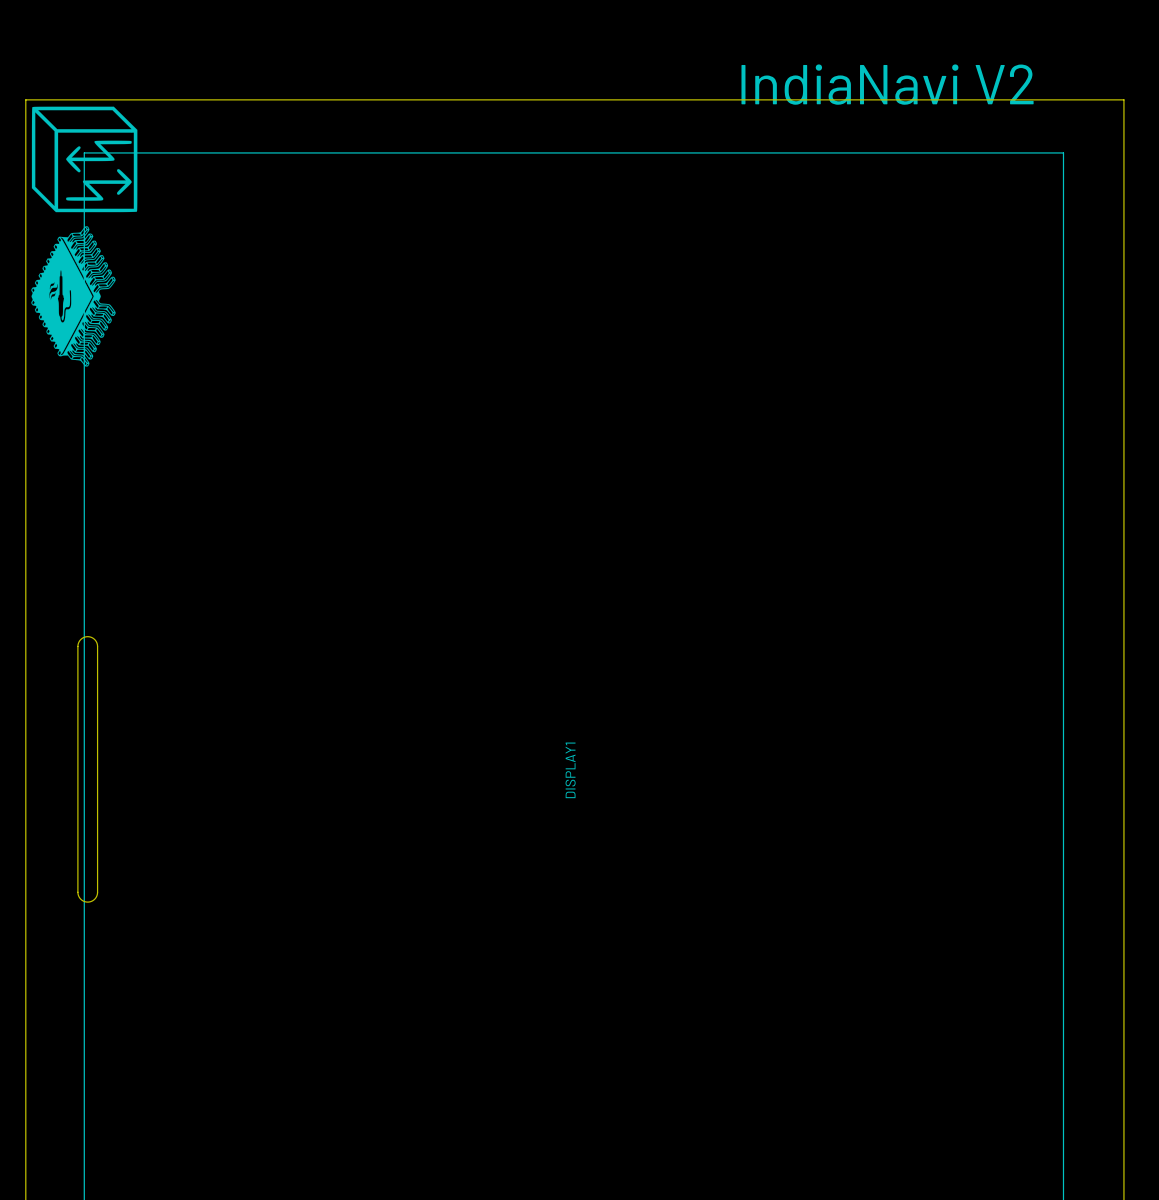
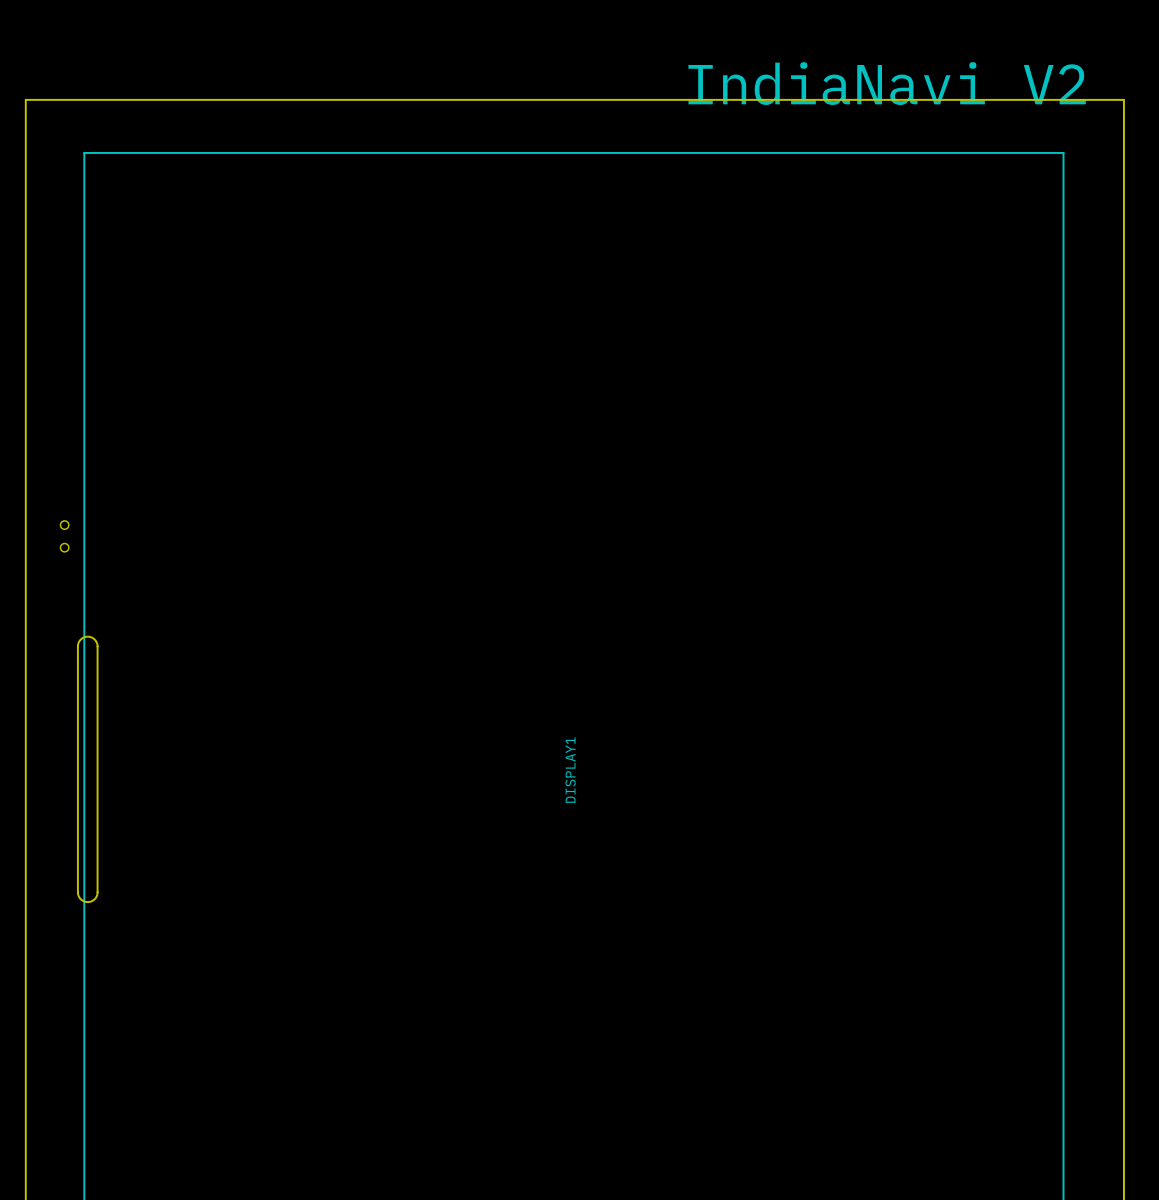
drawing: [31, 106, 138, 213] -> none
drawing: [31, 226, 116, 367] -> none
part: none -> (64, 536)

